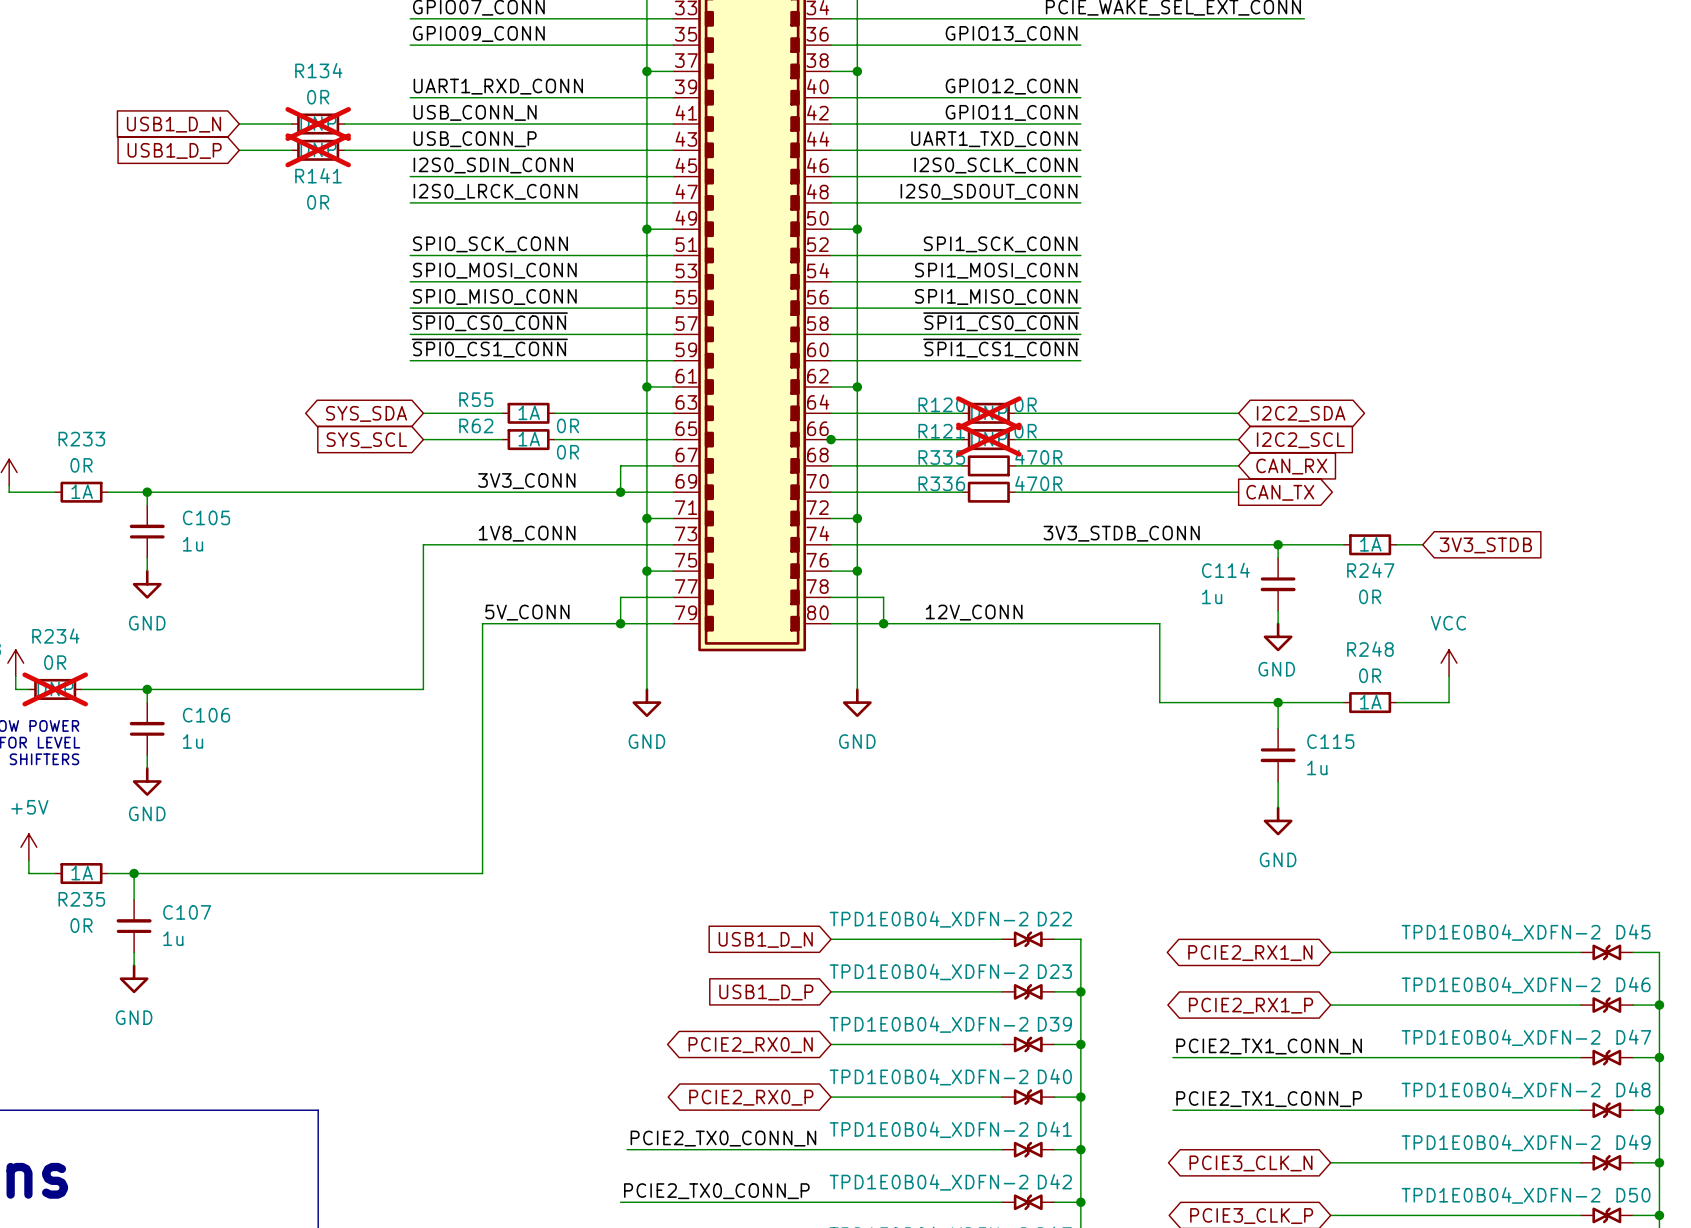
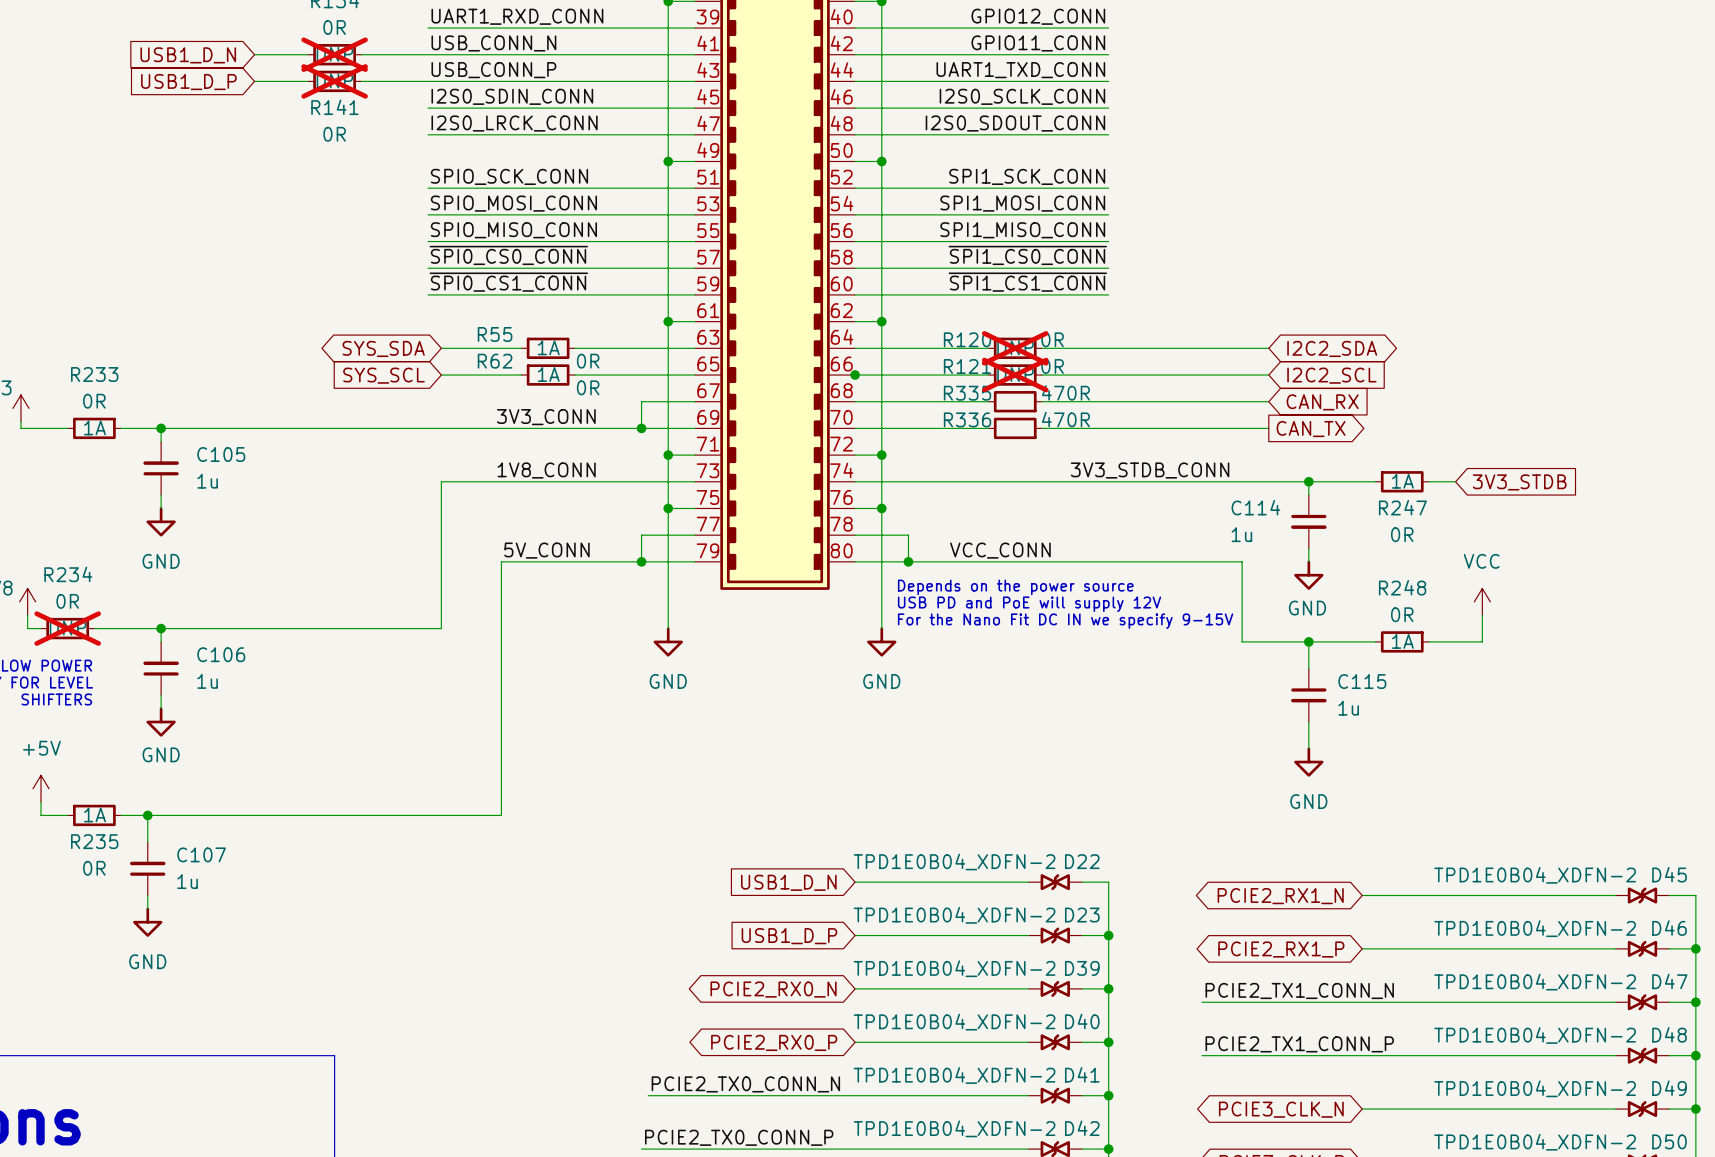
label: 12V_CONN (974, 612) -> VCC_CONN (1000, 550)
wire: (1159, 623) (1159, 702) (1212, 702) -> (1188, 561) (1242, 561) (1242, 641)
text: none -> Depends on the power source (1015, 587)
text: none -> USB PD and PoE will supply 12V (1029, 604)
text: none -> For the Nano Fit DC IN we specify 9-15V (1065, 621)

